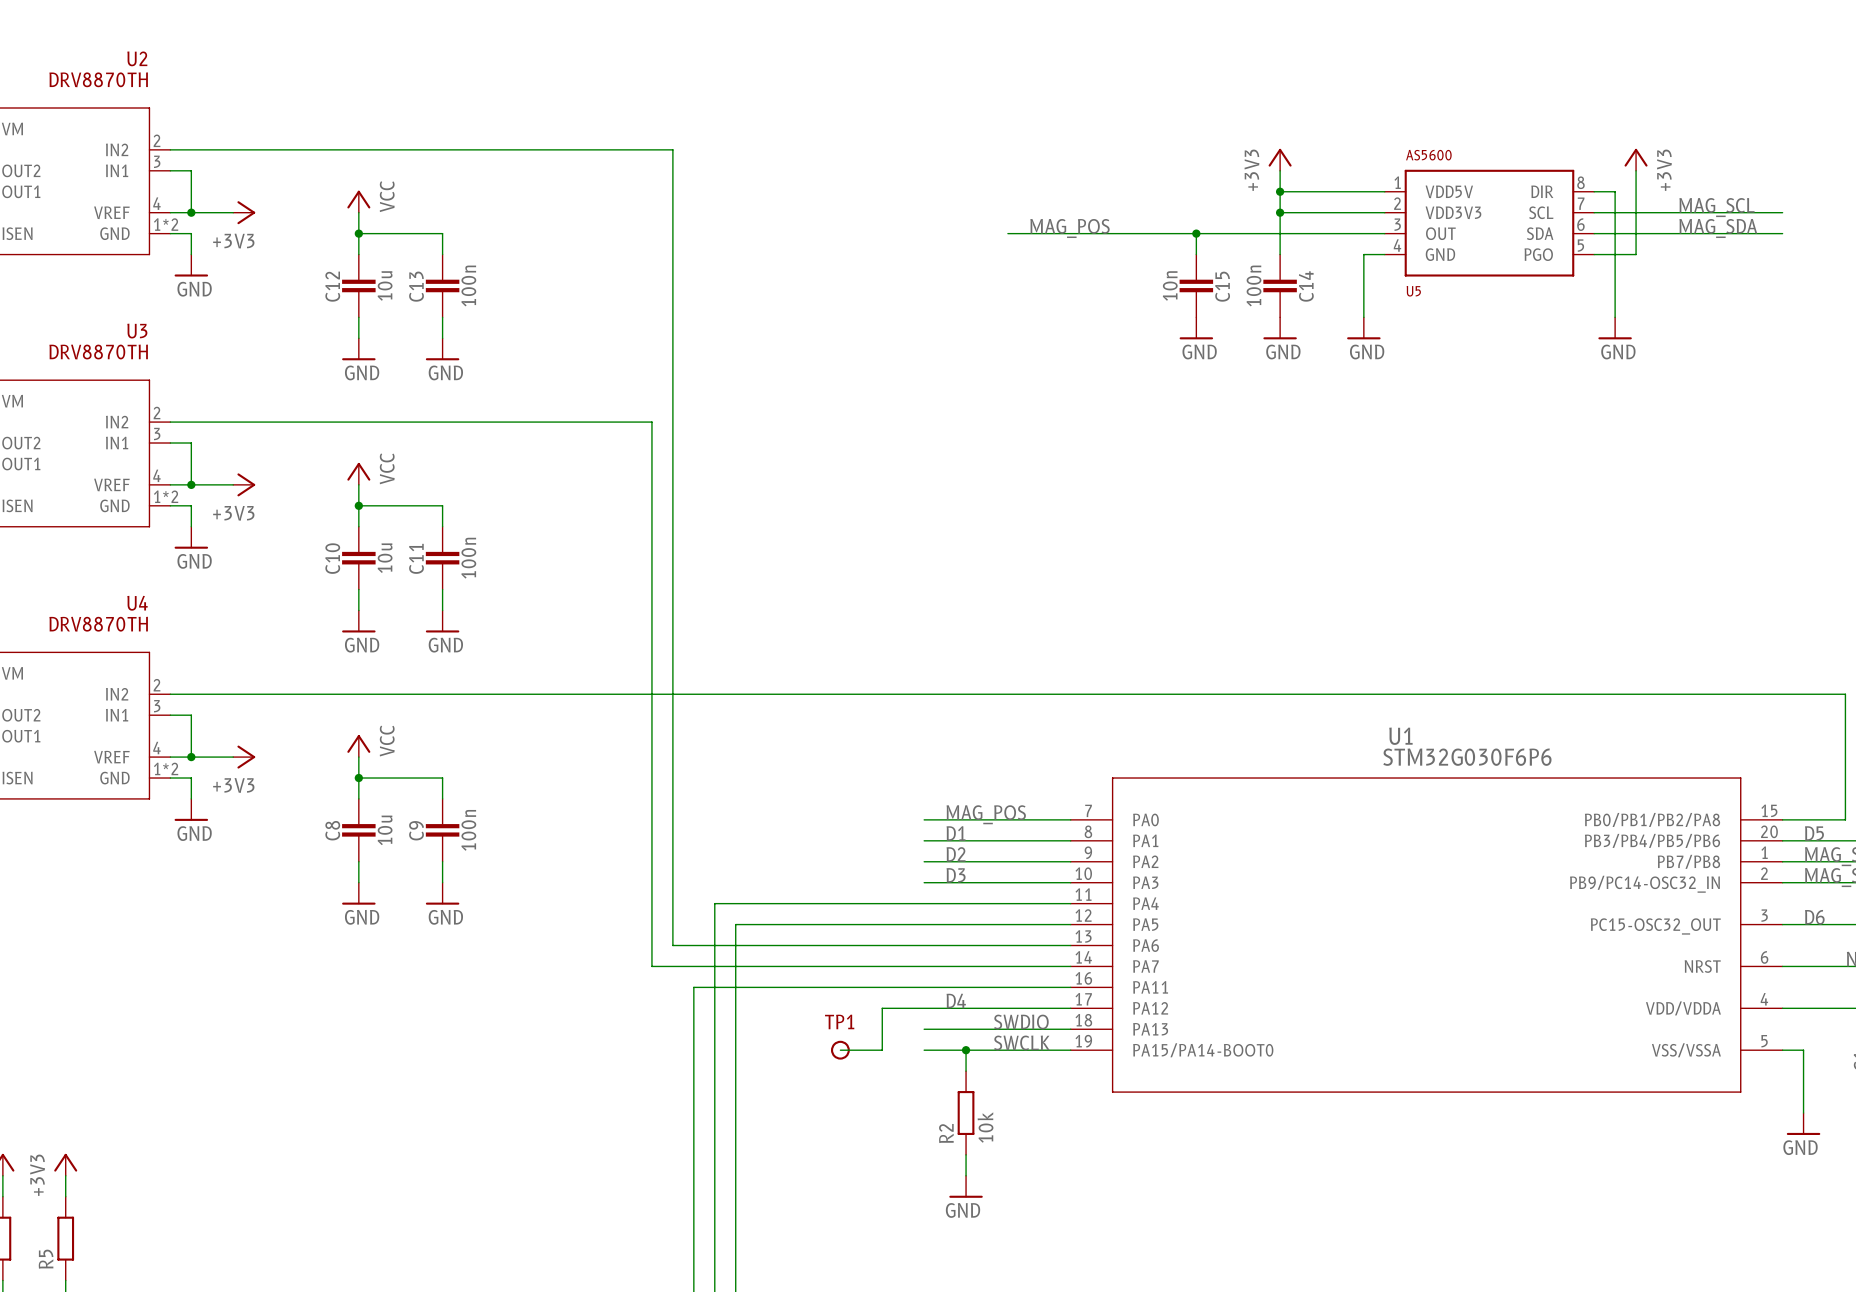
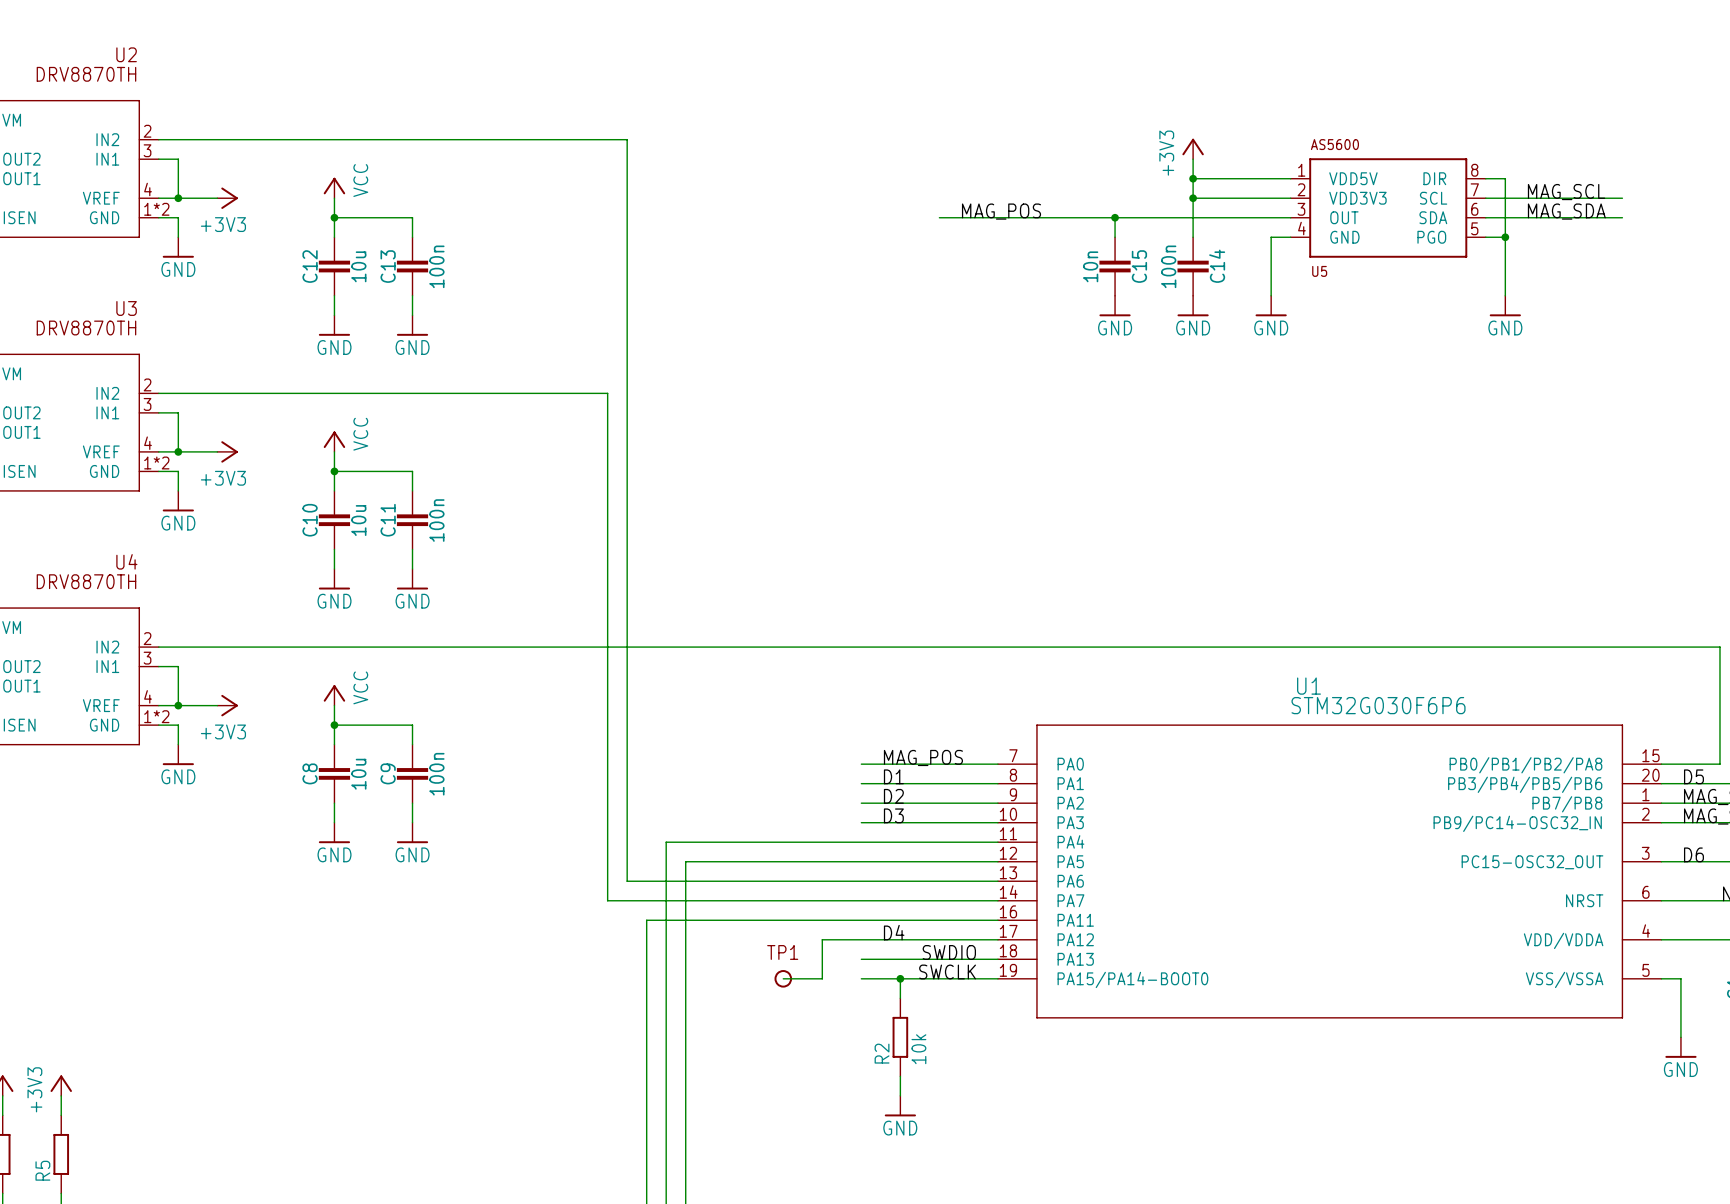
power symbol: +3V3 (1636, 159) -> none
wire: (1636, 170) (1636, 254) (1615, 254) -> none
label position: MAG_SCL (1717, 207) -> MAG_SCL (1566, 192)
wire: (1740, 212) (1782, 212) -> none
label position: MAG_SDA (1718, 228) -> MAG_SDA (1566, 211)
wire: (1740, 233) (1782, 233) -> none
junction: none -> (1505, 237)

